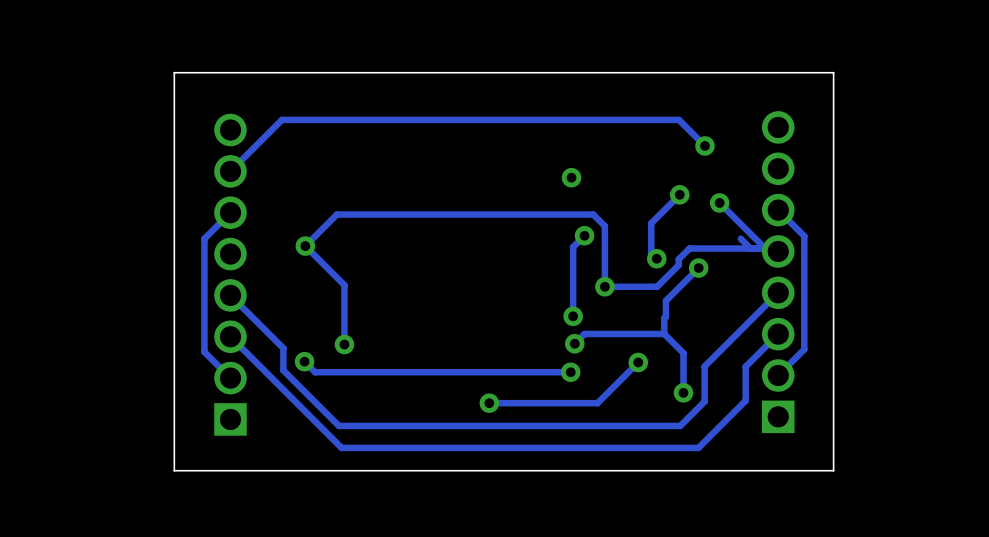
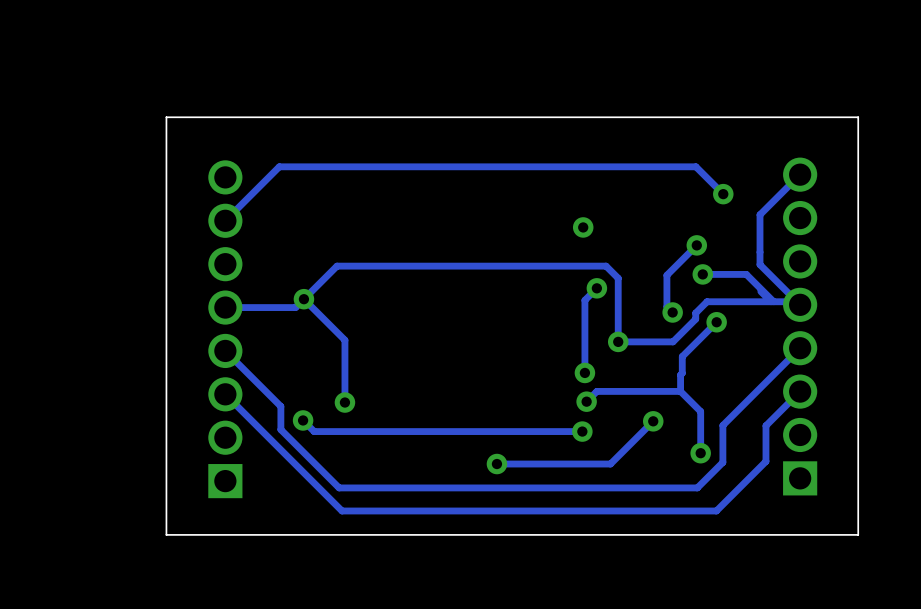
track: none -> (800, 174) (760, 214) (760, 264) (797, 301)
track: (719, 202) (765, 248) -> none
via position: (719, 202) -> (702, 274)
track: (778, 210) (804, 236) (804, 349) (778, 375) -> none
track: (230, 212) (204, 238) (204, 352) (230, 378) -> none
track: none -> (702, 274) (746, 274) (773, 301)
track: none -> (303, 299) (295, 307) (225, 307)

